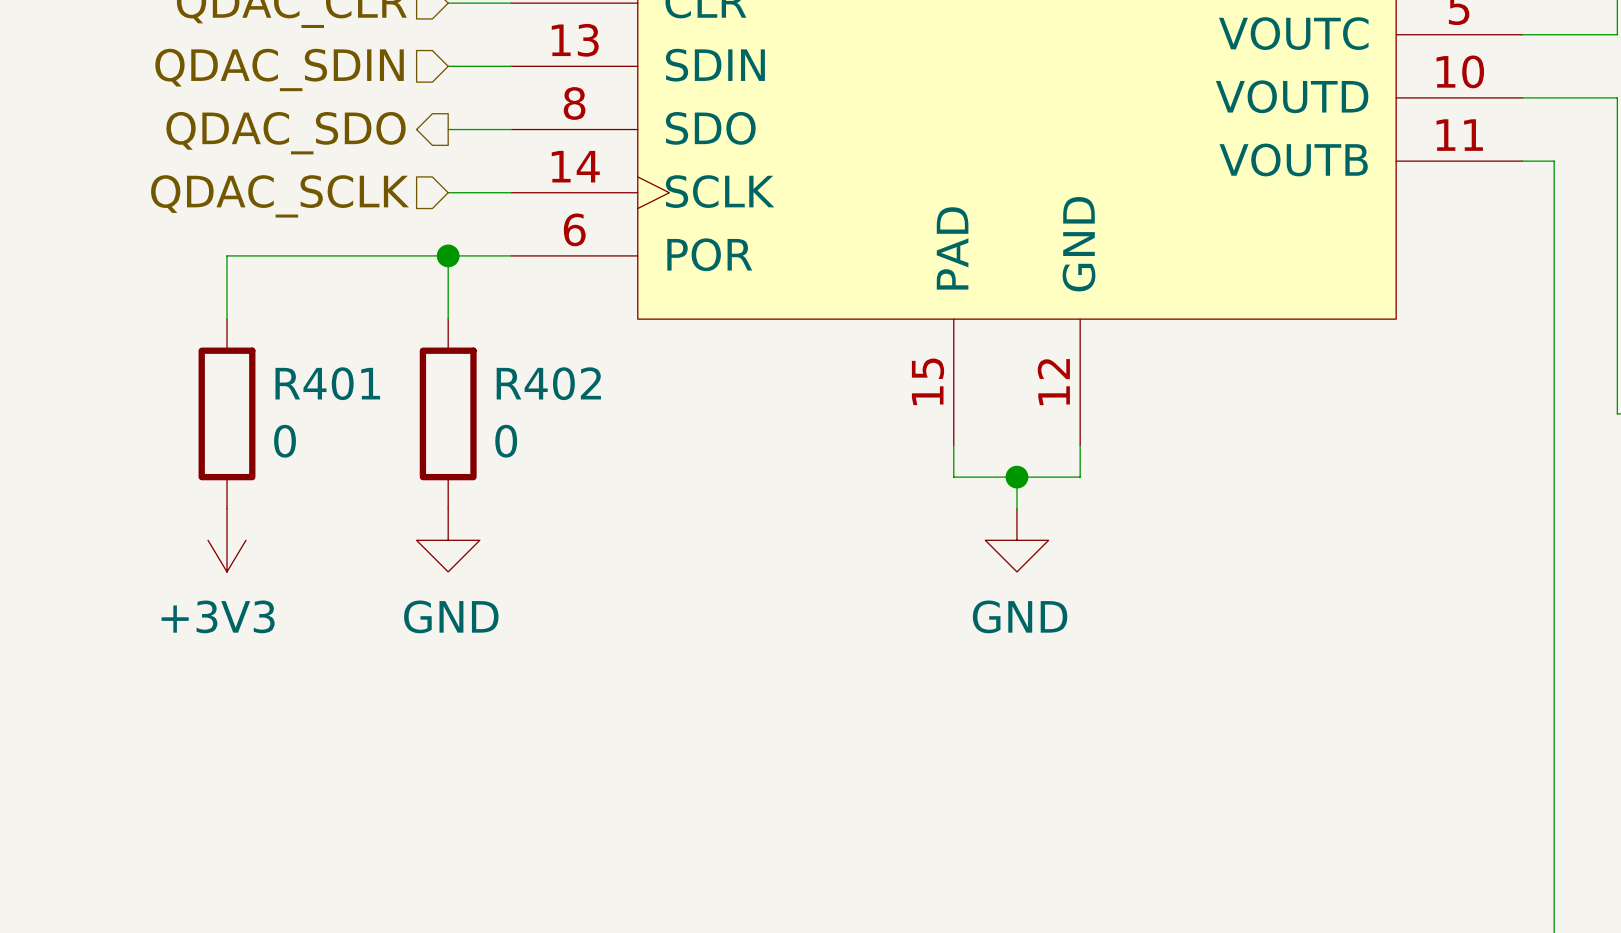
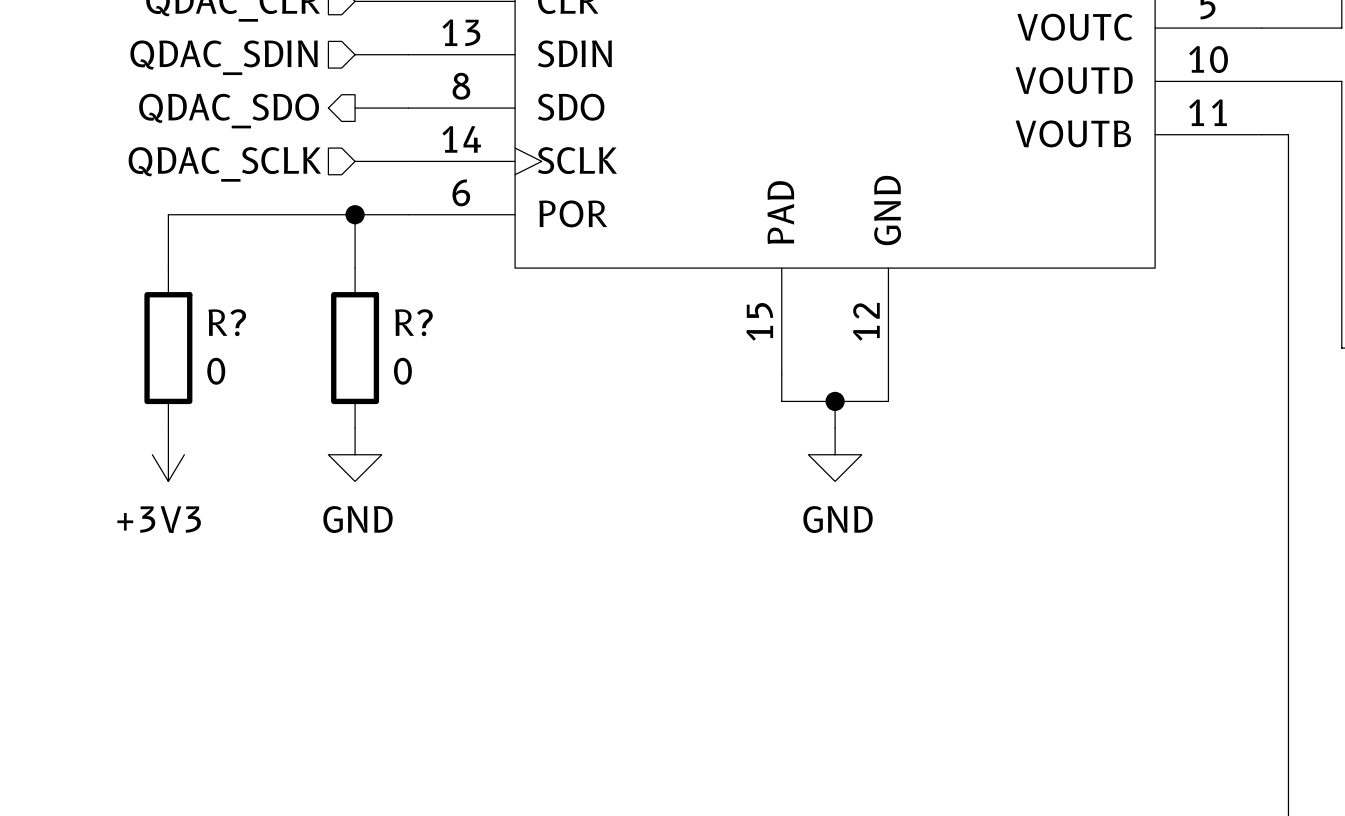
R401 name: R401 (327, 383) -> R? (227, 322)
R402 name: R402 (548, 383) -> R? (413, 322)

